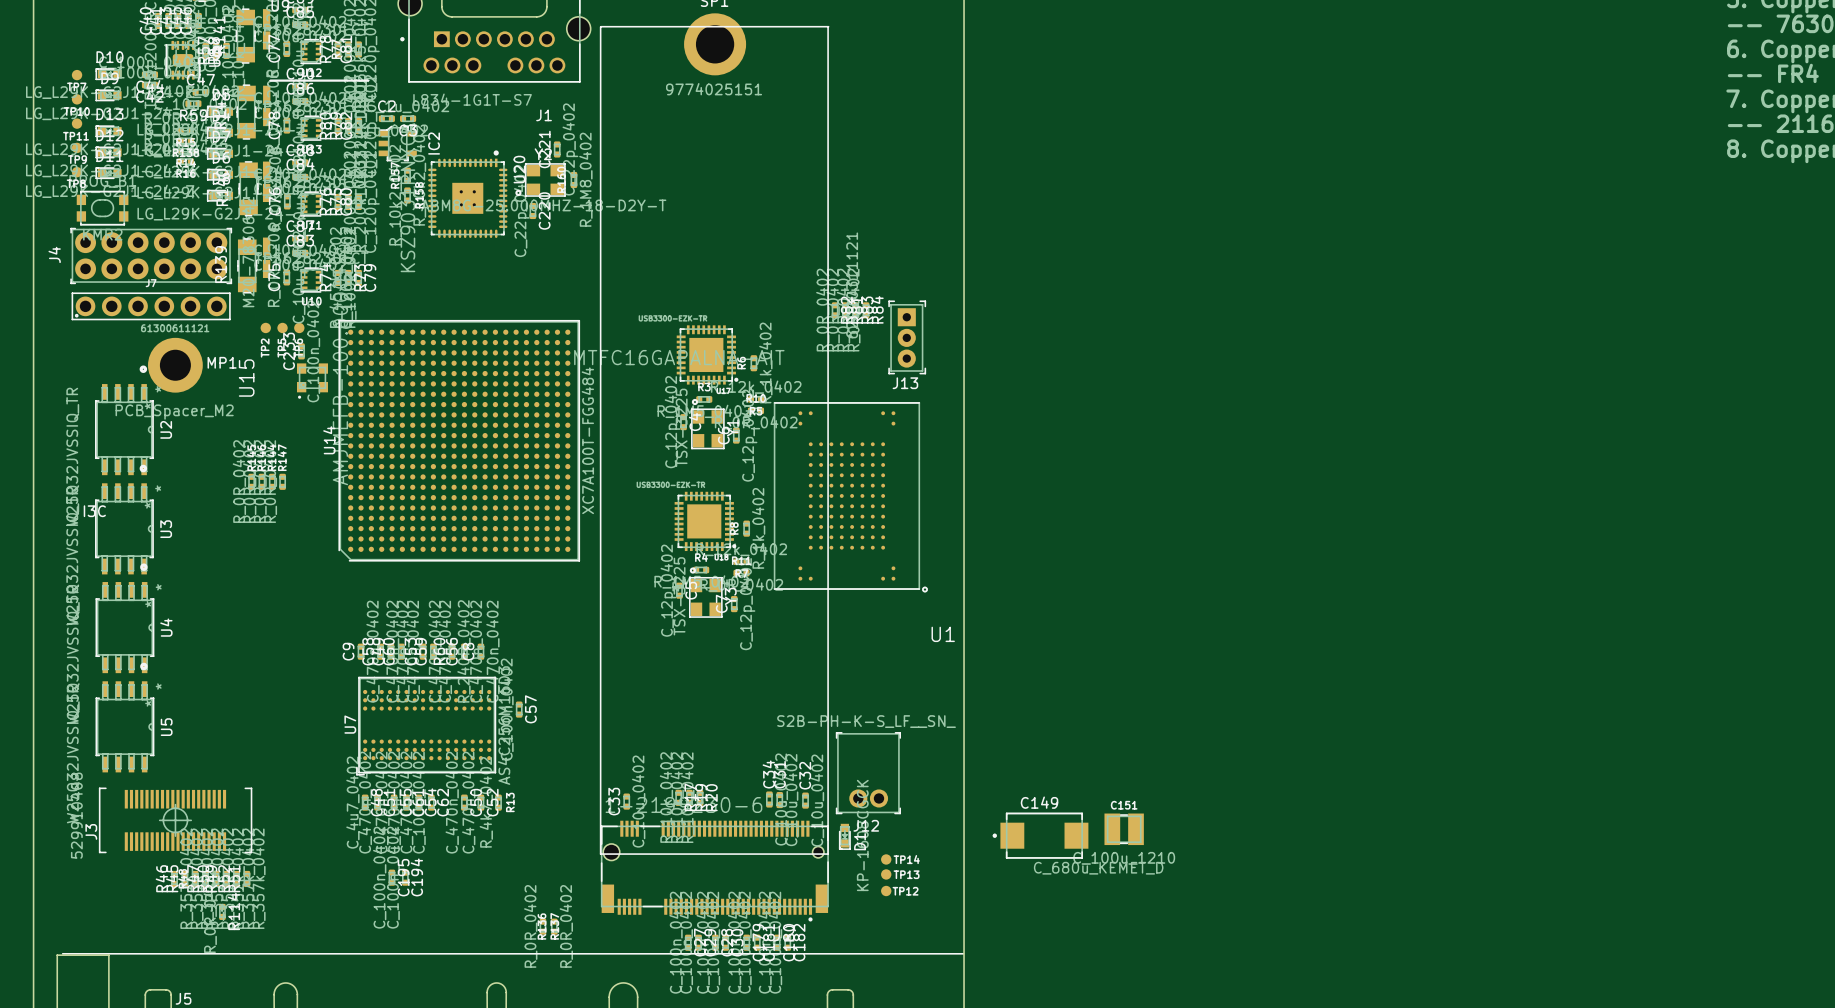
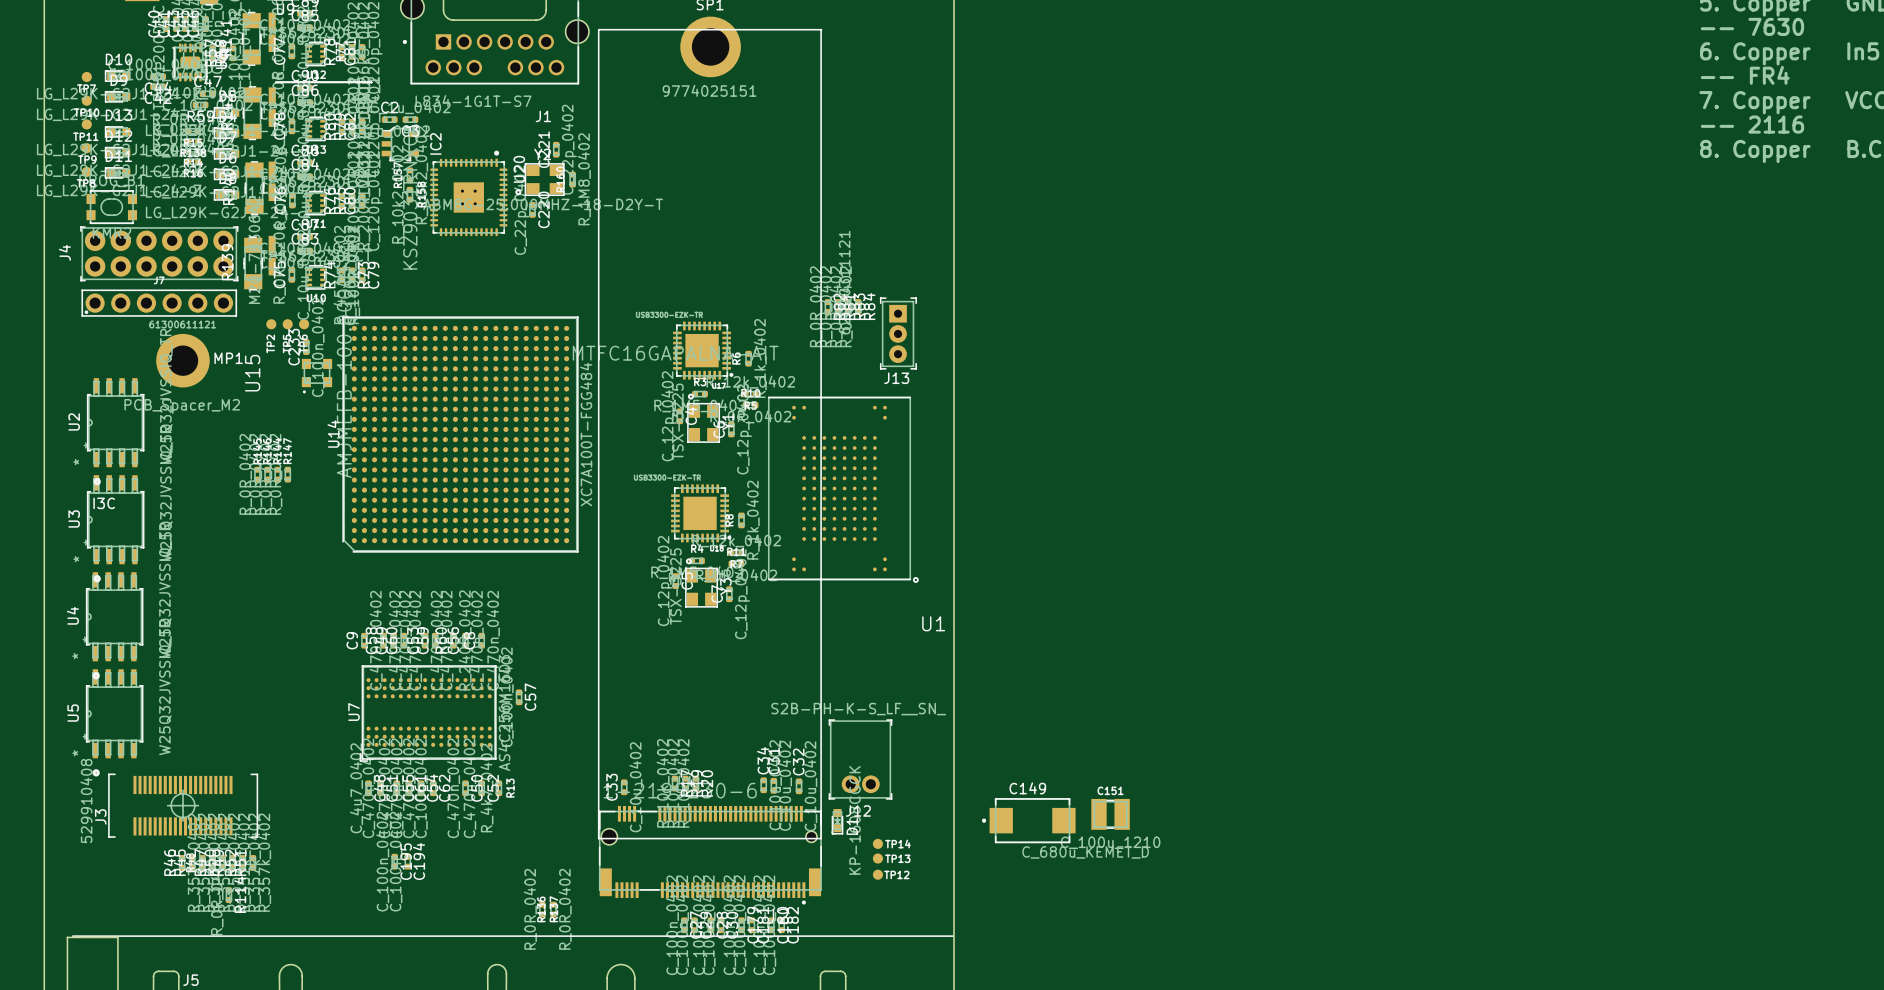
U2 rotation: 0° (124, 420) -> 180° (115, 431)
U3 rotation: 0° (124, 519) -> 180° (115, 528)
U4 rotation: 0° (124, 618) -> 180° (114, 625)
U5 rotation: 0° (124, 717) -> 180° (114, 722)

